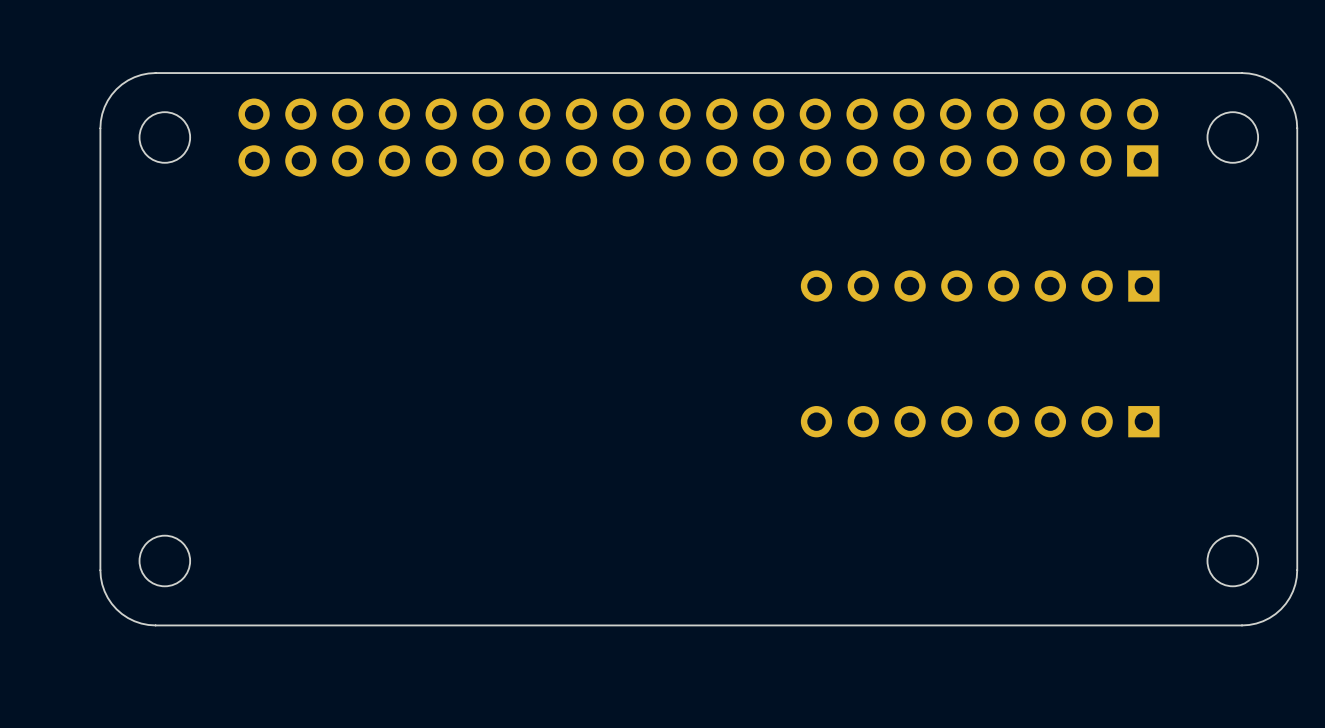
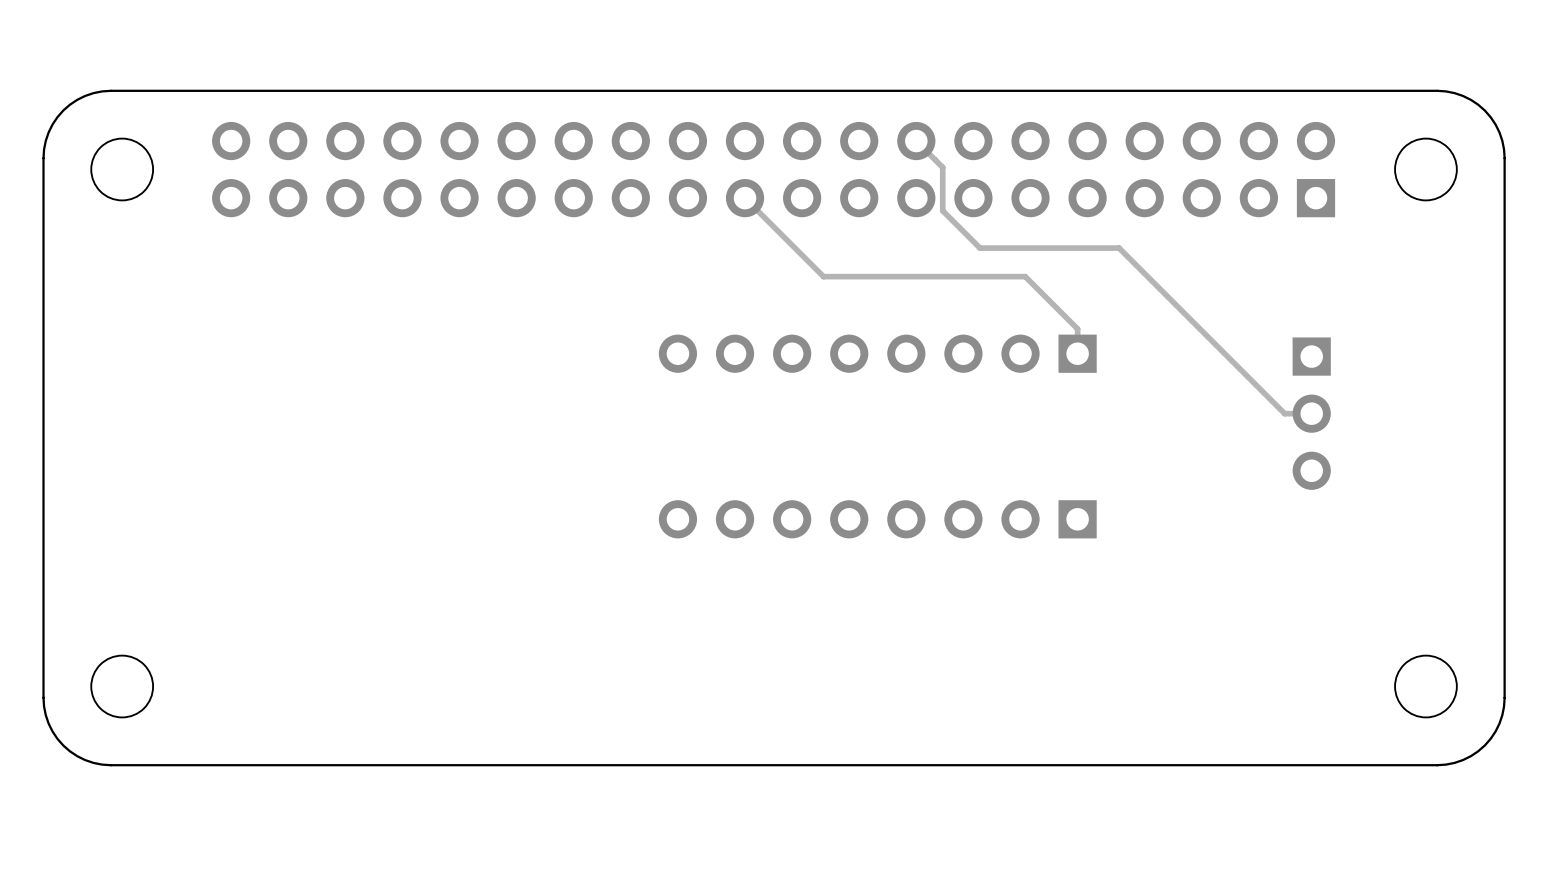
track: none -> (916, 141) (942, 167) (942, 210) (980, 248) (1119, 248) (1284, 413) (1311, 413)
track: none -> (745, 198) (823, 276) (1025, 276) (1077, 328) (1077, 353)
part: (980, 286) -> none
part: none -> (877, 353)
part: none -> (1311, 413)
part: (980, 421) -> none
part: none -> (877, 519)

